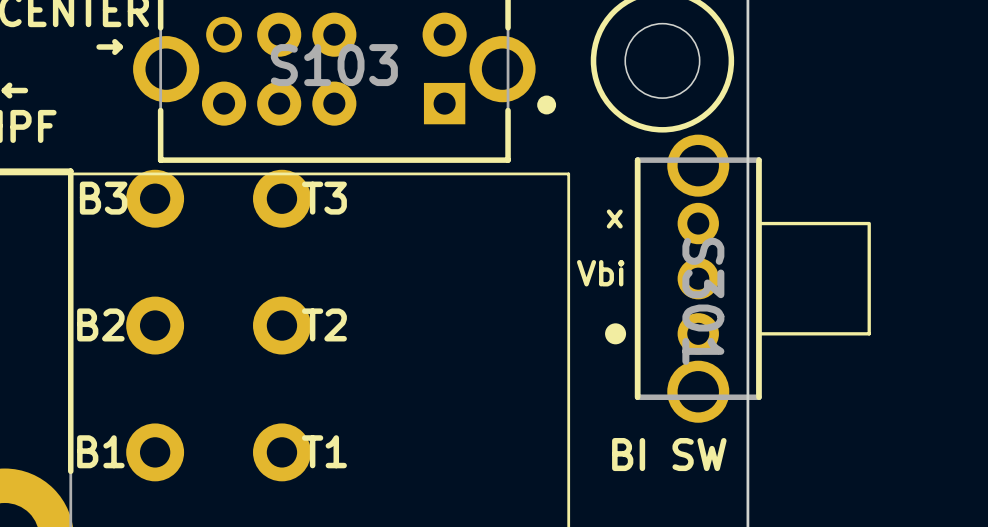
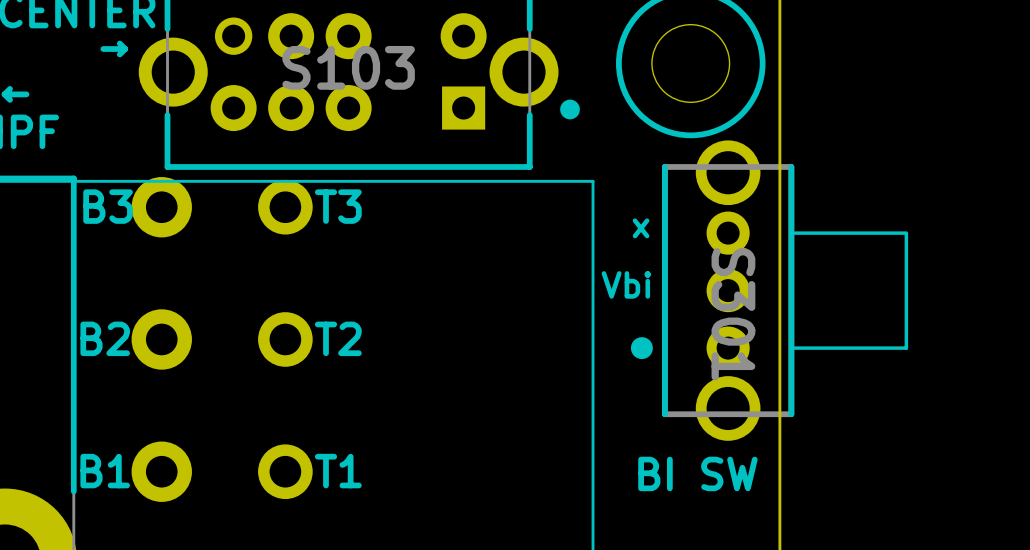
part footprint: [253, 169, 311, 228] -> [258, 179, 313, 235]
part footprint: [253, 296, 311, 355] -> [258, 312, 313, 367]
part footprint: [253, 423, 311, 482] -> [258, 444, 313, 500]

